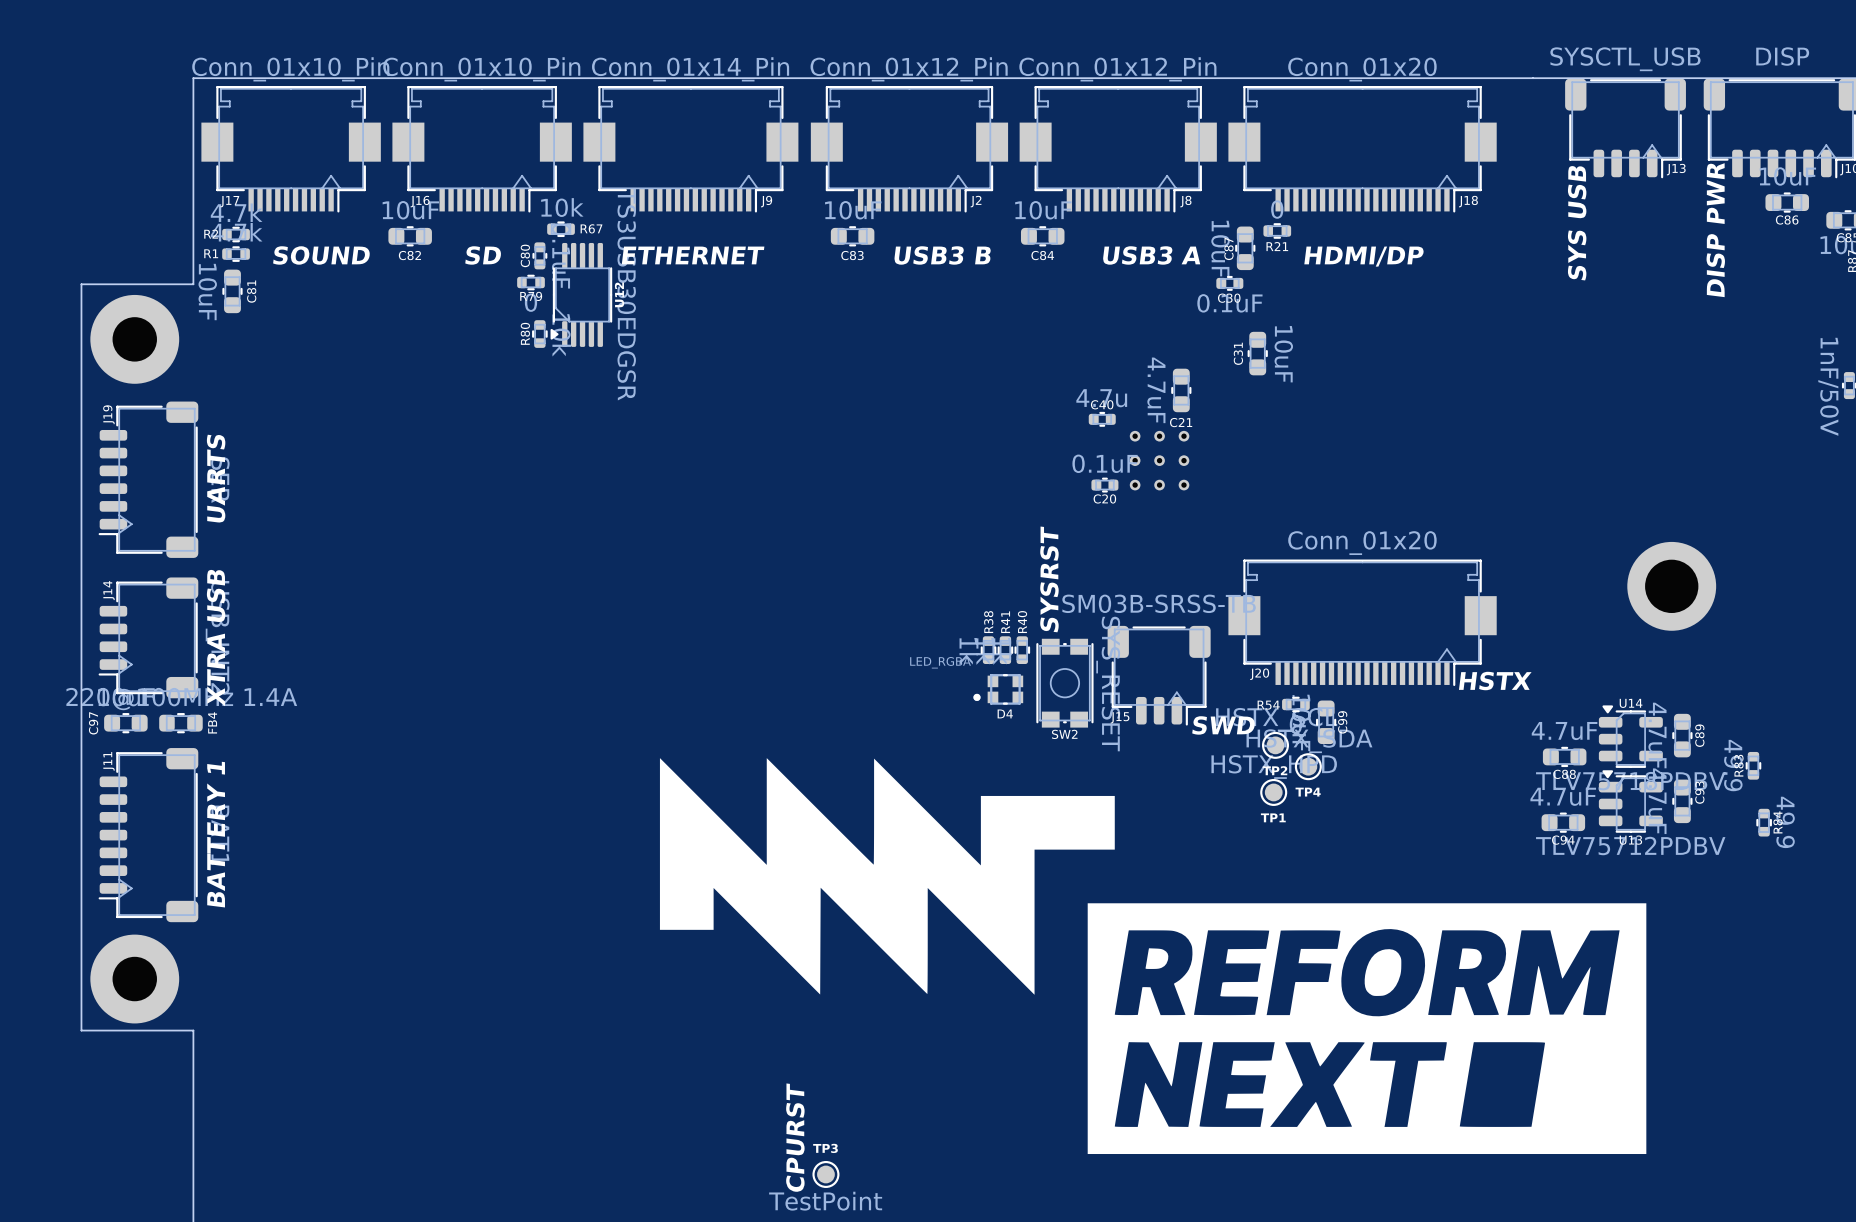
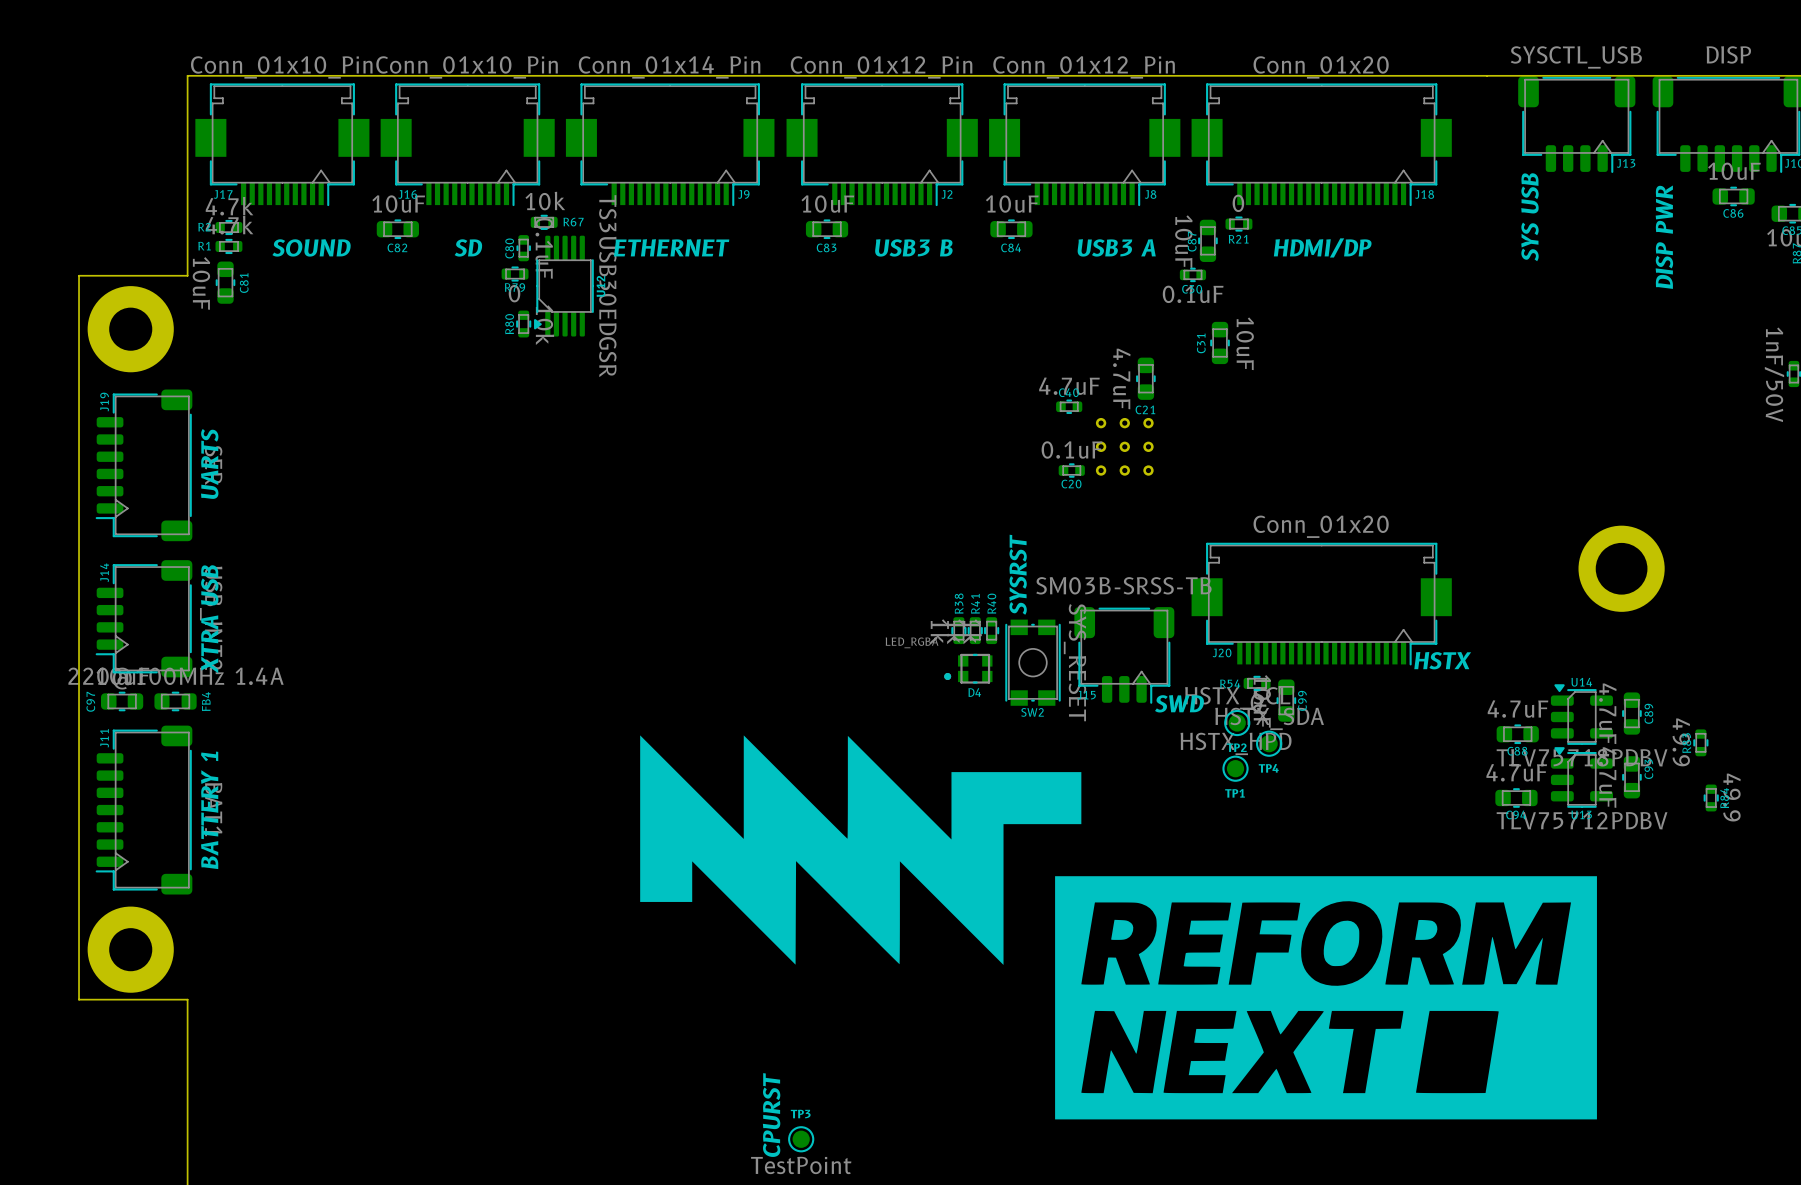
C40 value: 4.7u (1101, 398) -> 4.7uF (1069, 386)

